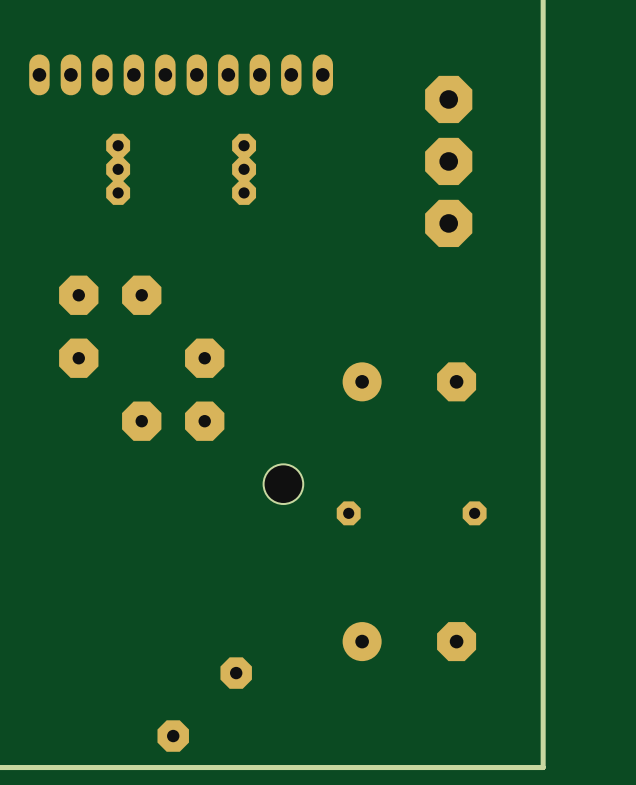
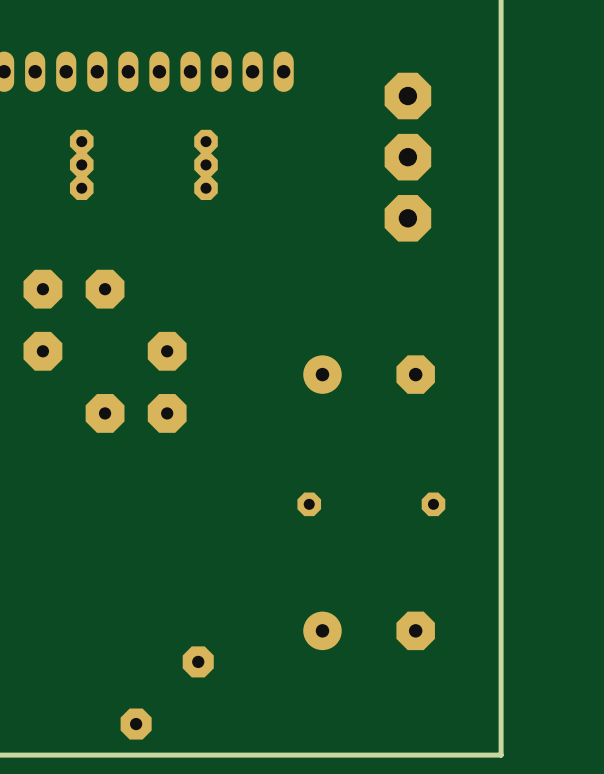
hole: (283, 484) -> none

